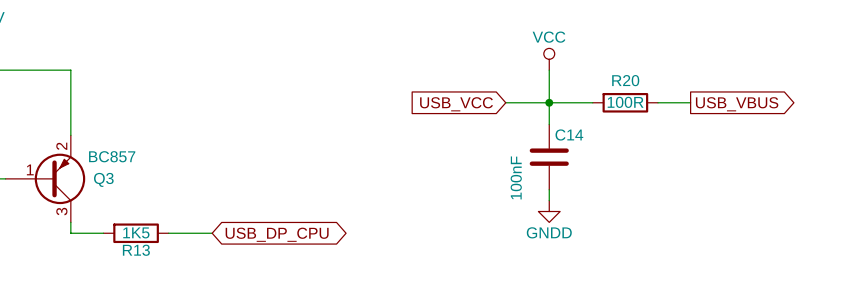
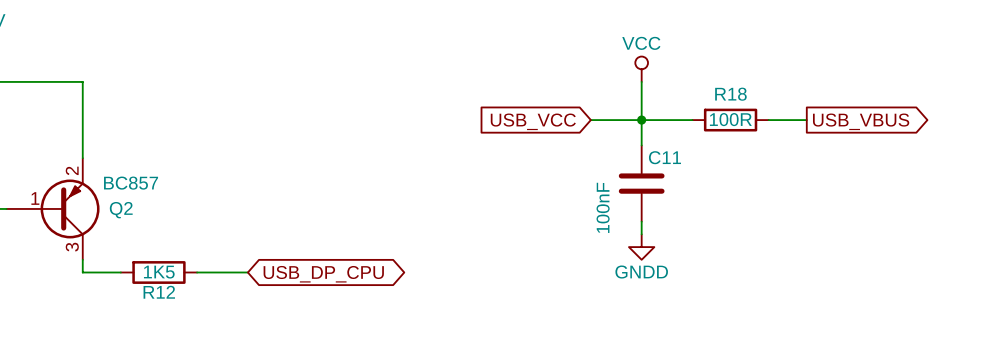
R20 name: R20 (625, 80) -> R18 (730, 94)
C14 name: C14 (569, 134) -> C11 (664, 157)
Q3 name: Q3 (103, 179) -> Q2 (121, 210)
R13 name: R13 (136, 250) -> R12 (159, 292)

